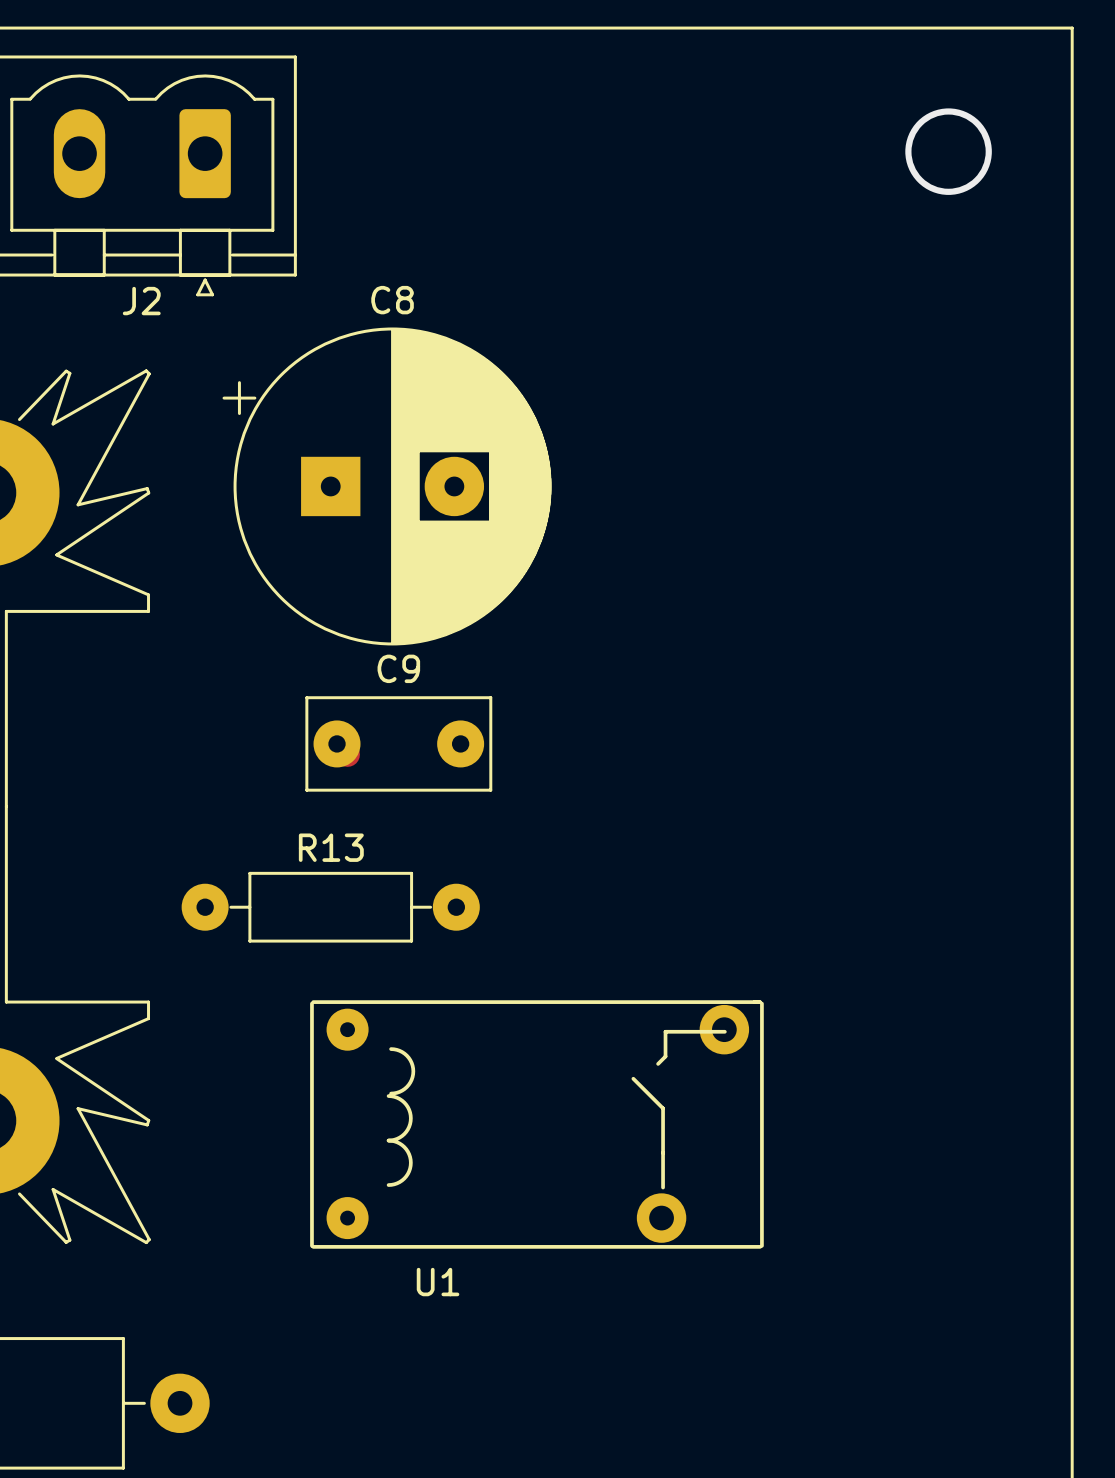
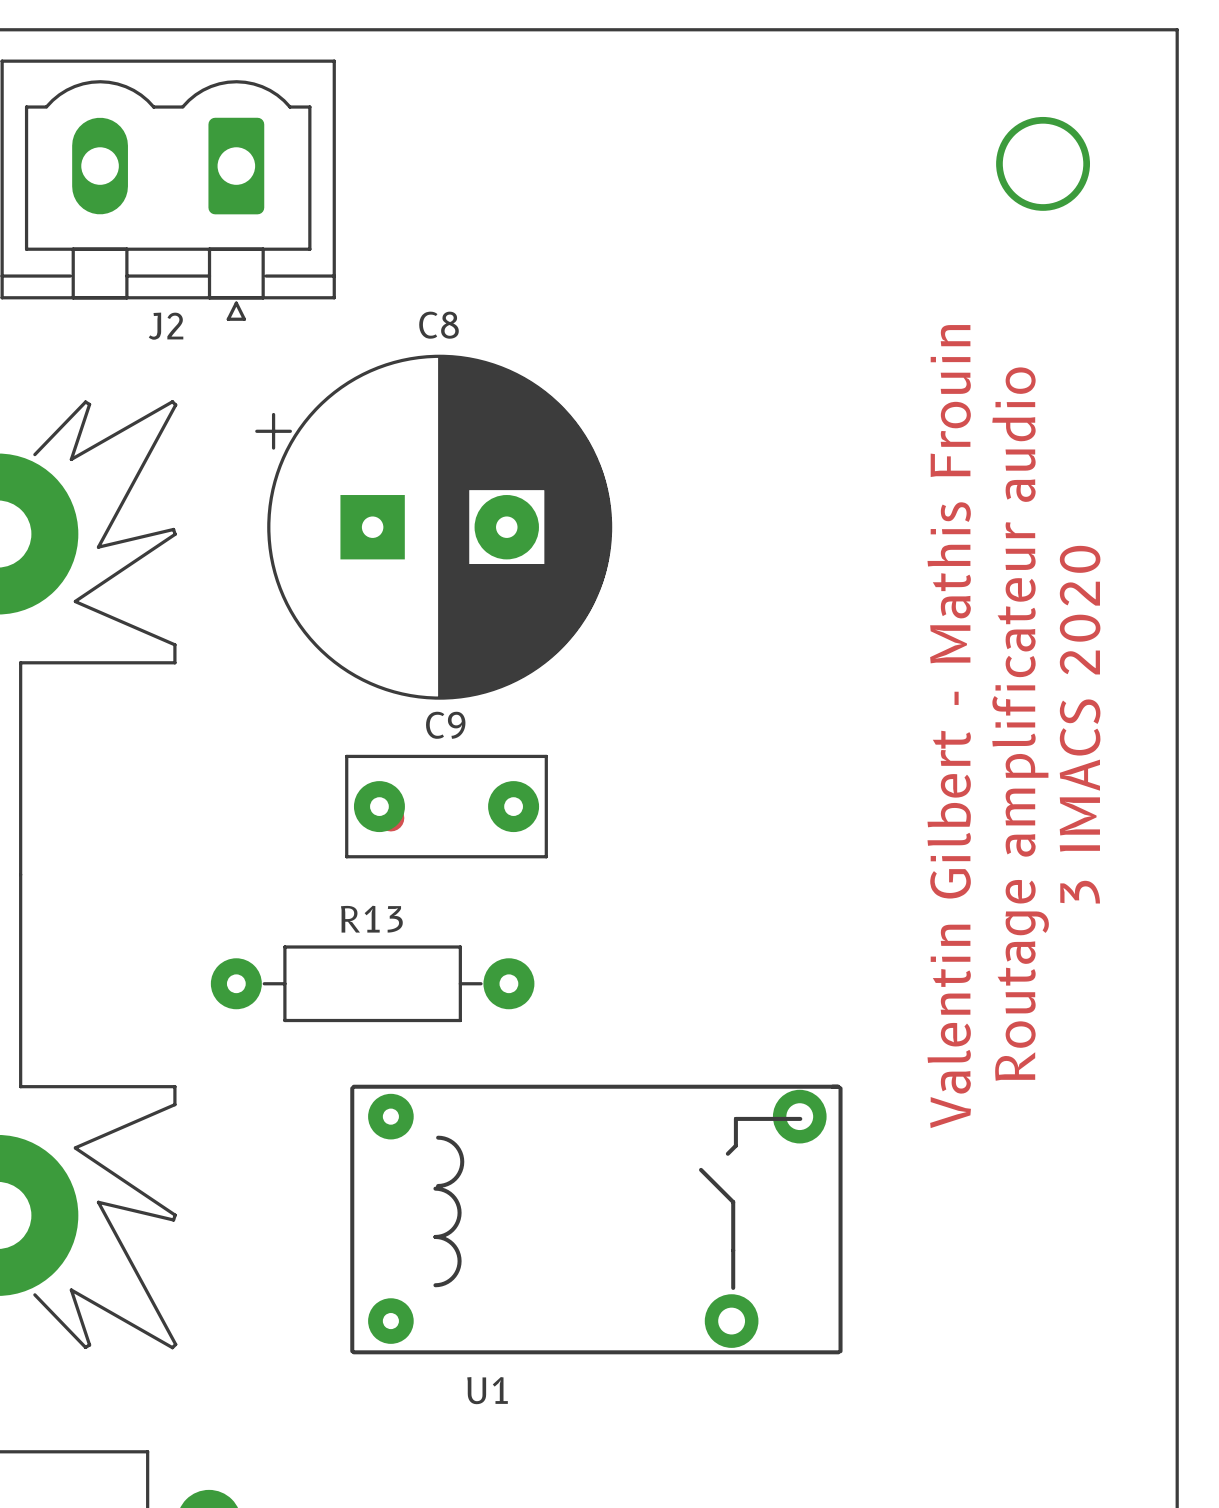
text: none -> Routage amplificateur audio (1020, 724)
text: none -> 3 IMACS 2020 (1080, 724)
text: none -> Valentin Gilbert - Mathis Frouin (949, 726)

